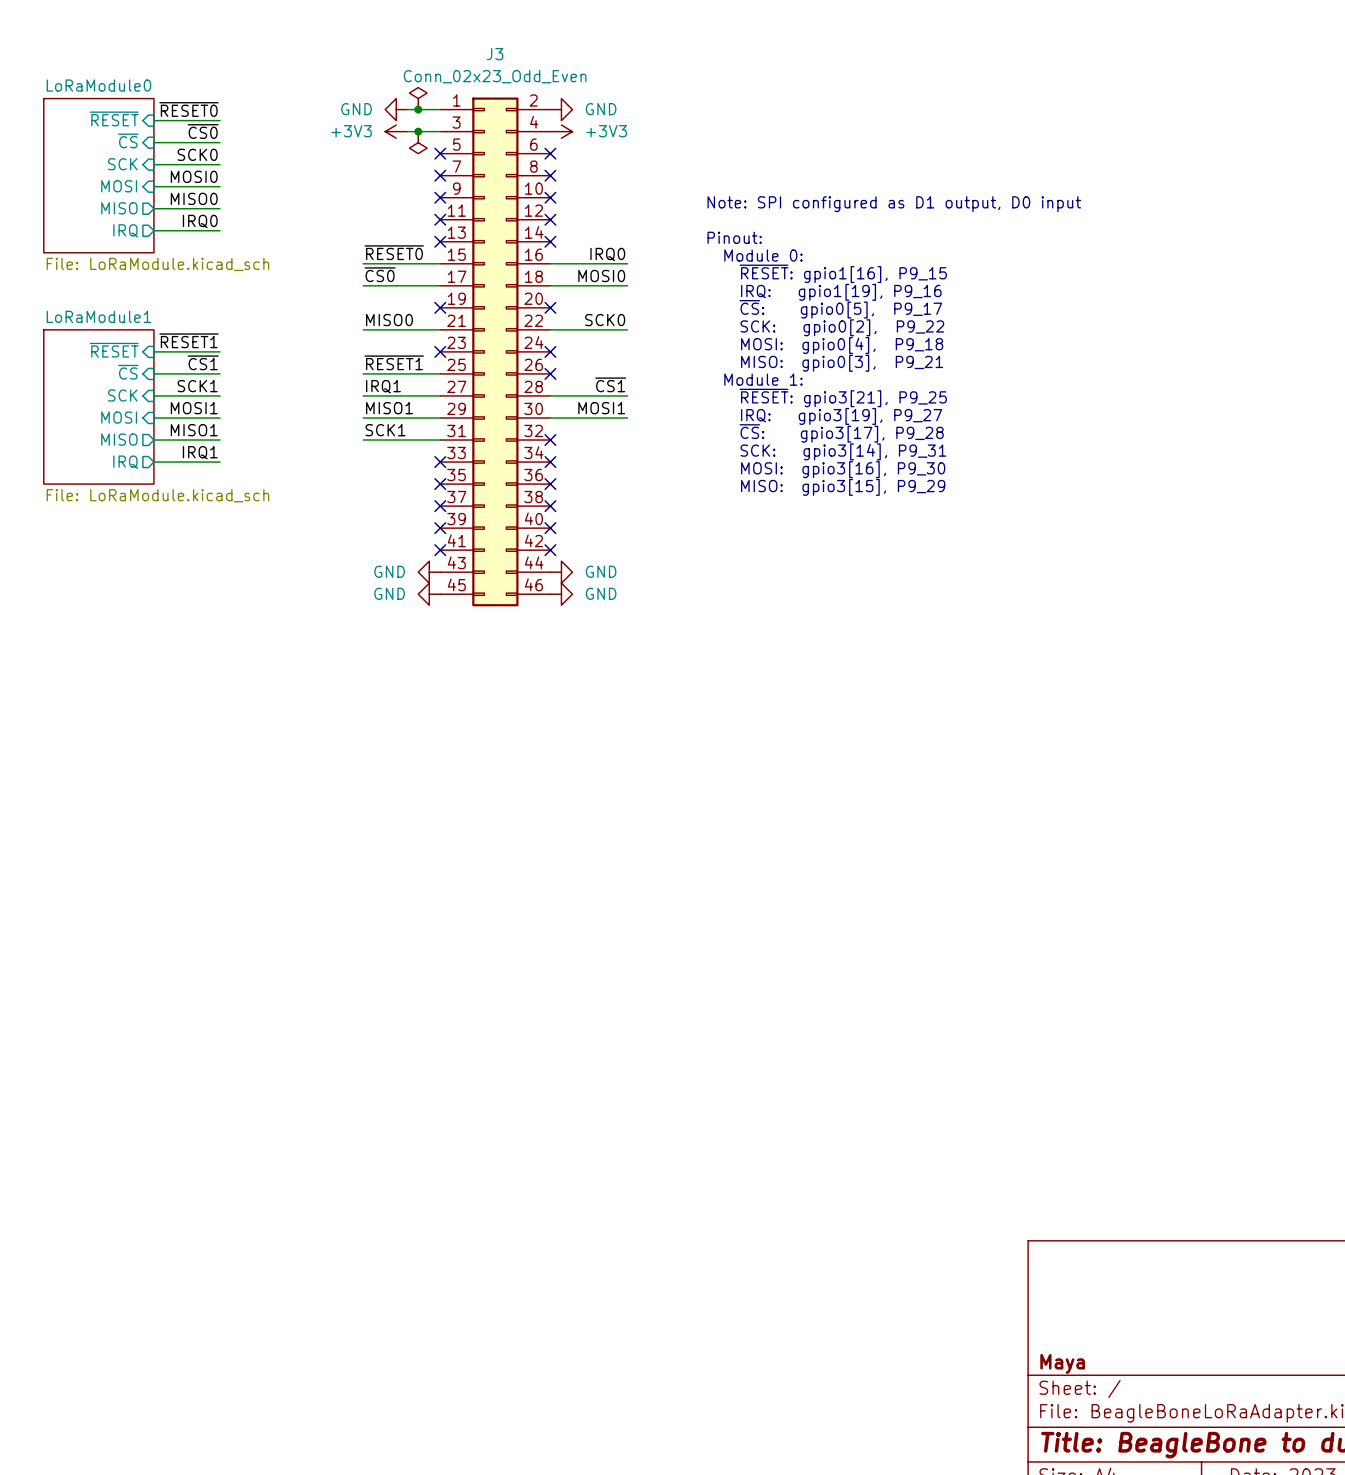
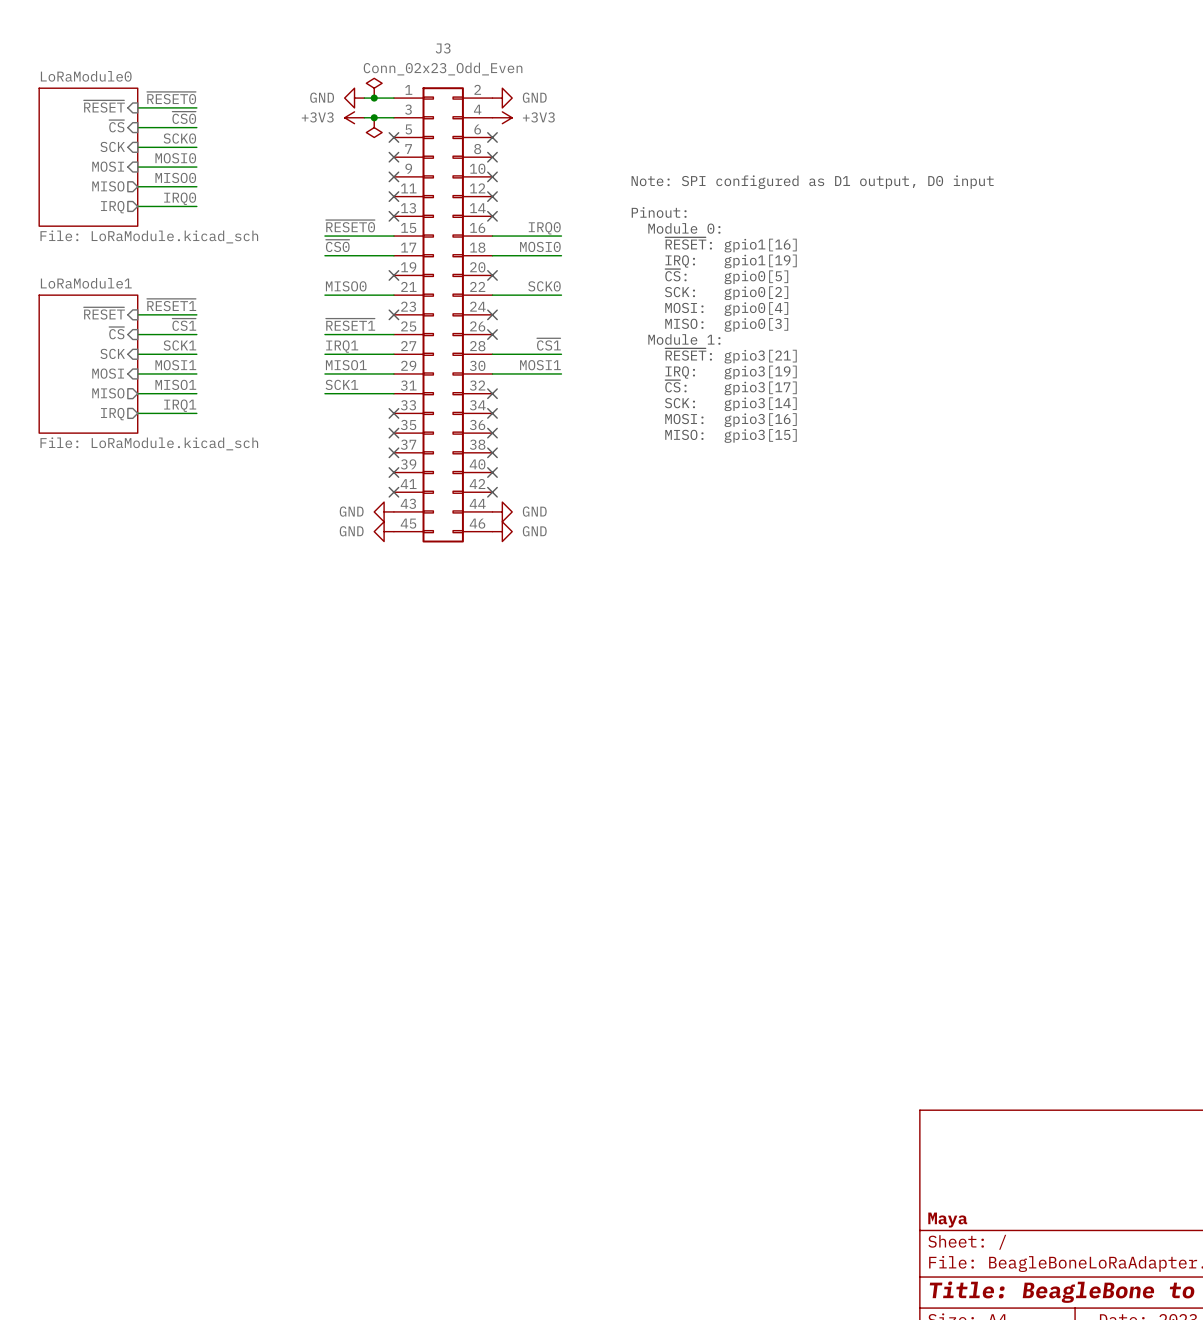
text: ~{RESET}: gpio1[16], P9_15 (843, 273) -> ~{RESET}: gpio1[16] (731, 244)
text: IRQ: gpio1[19], P9_16 (841, 292) -> IRQ: gpio1[19] (731, 261)
text: ~{CS}: gpio0[5], P9_17 (840, 309) -> ~{CS}: gpio0[5] (726, 276)
text: SCK: gpio0[2], P9_22 (842, 327) -> SCK: gpio0[2] (726, 293)
text: MOSI: gpio0[4], P9_18 (842, 345) -> MOSI: gpio0[4] (726, 309)
text: MISO: gpio0[3], P9_21 (842, 363) -> MISO: gpio0[3] (726, 324)
text: ~{RESET}: gpio3[21], P9_25 (843, 397) -> ~{RESET}: gpio3[21] (731, 355)
text: IRQ: gpio3[19], P9_27 (841, 416) -> IRQ: gpio3[19] (731, 372)
text: ~{CS}: gpio3[17], P9_28 (841, 433) -> ~{CS}: gpio3[17] (731, 387)
text: SCK: gpio3[14], P9_31 (843, 451) -> SCK: gpio3[14] (730, 404)
text: MOSI: gpio3[16], P9_30 (843, 469) -> MOSI: gpio3[16] (730, 420)
text: MISO: gpio3[15], P9_29 (843, 487) -> MISO: gpio3[15] (730, 435)

